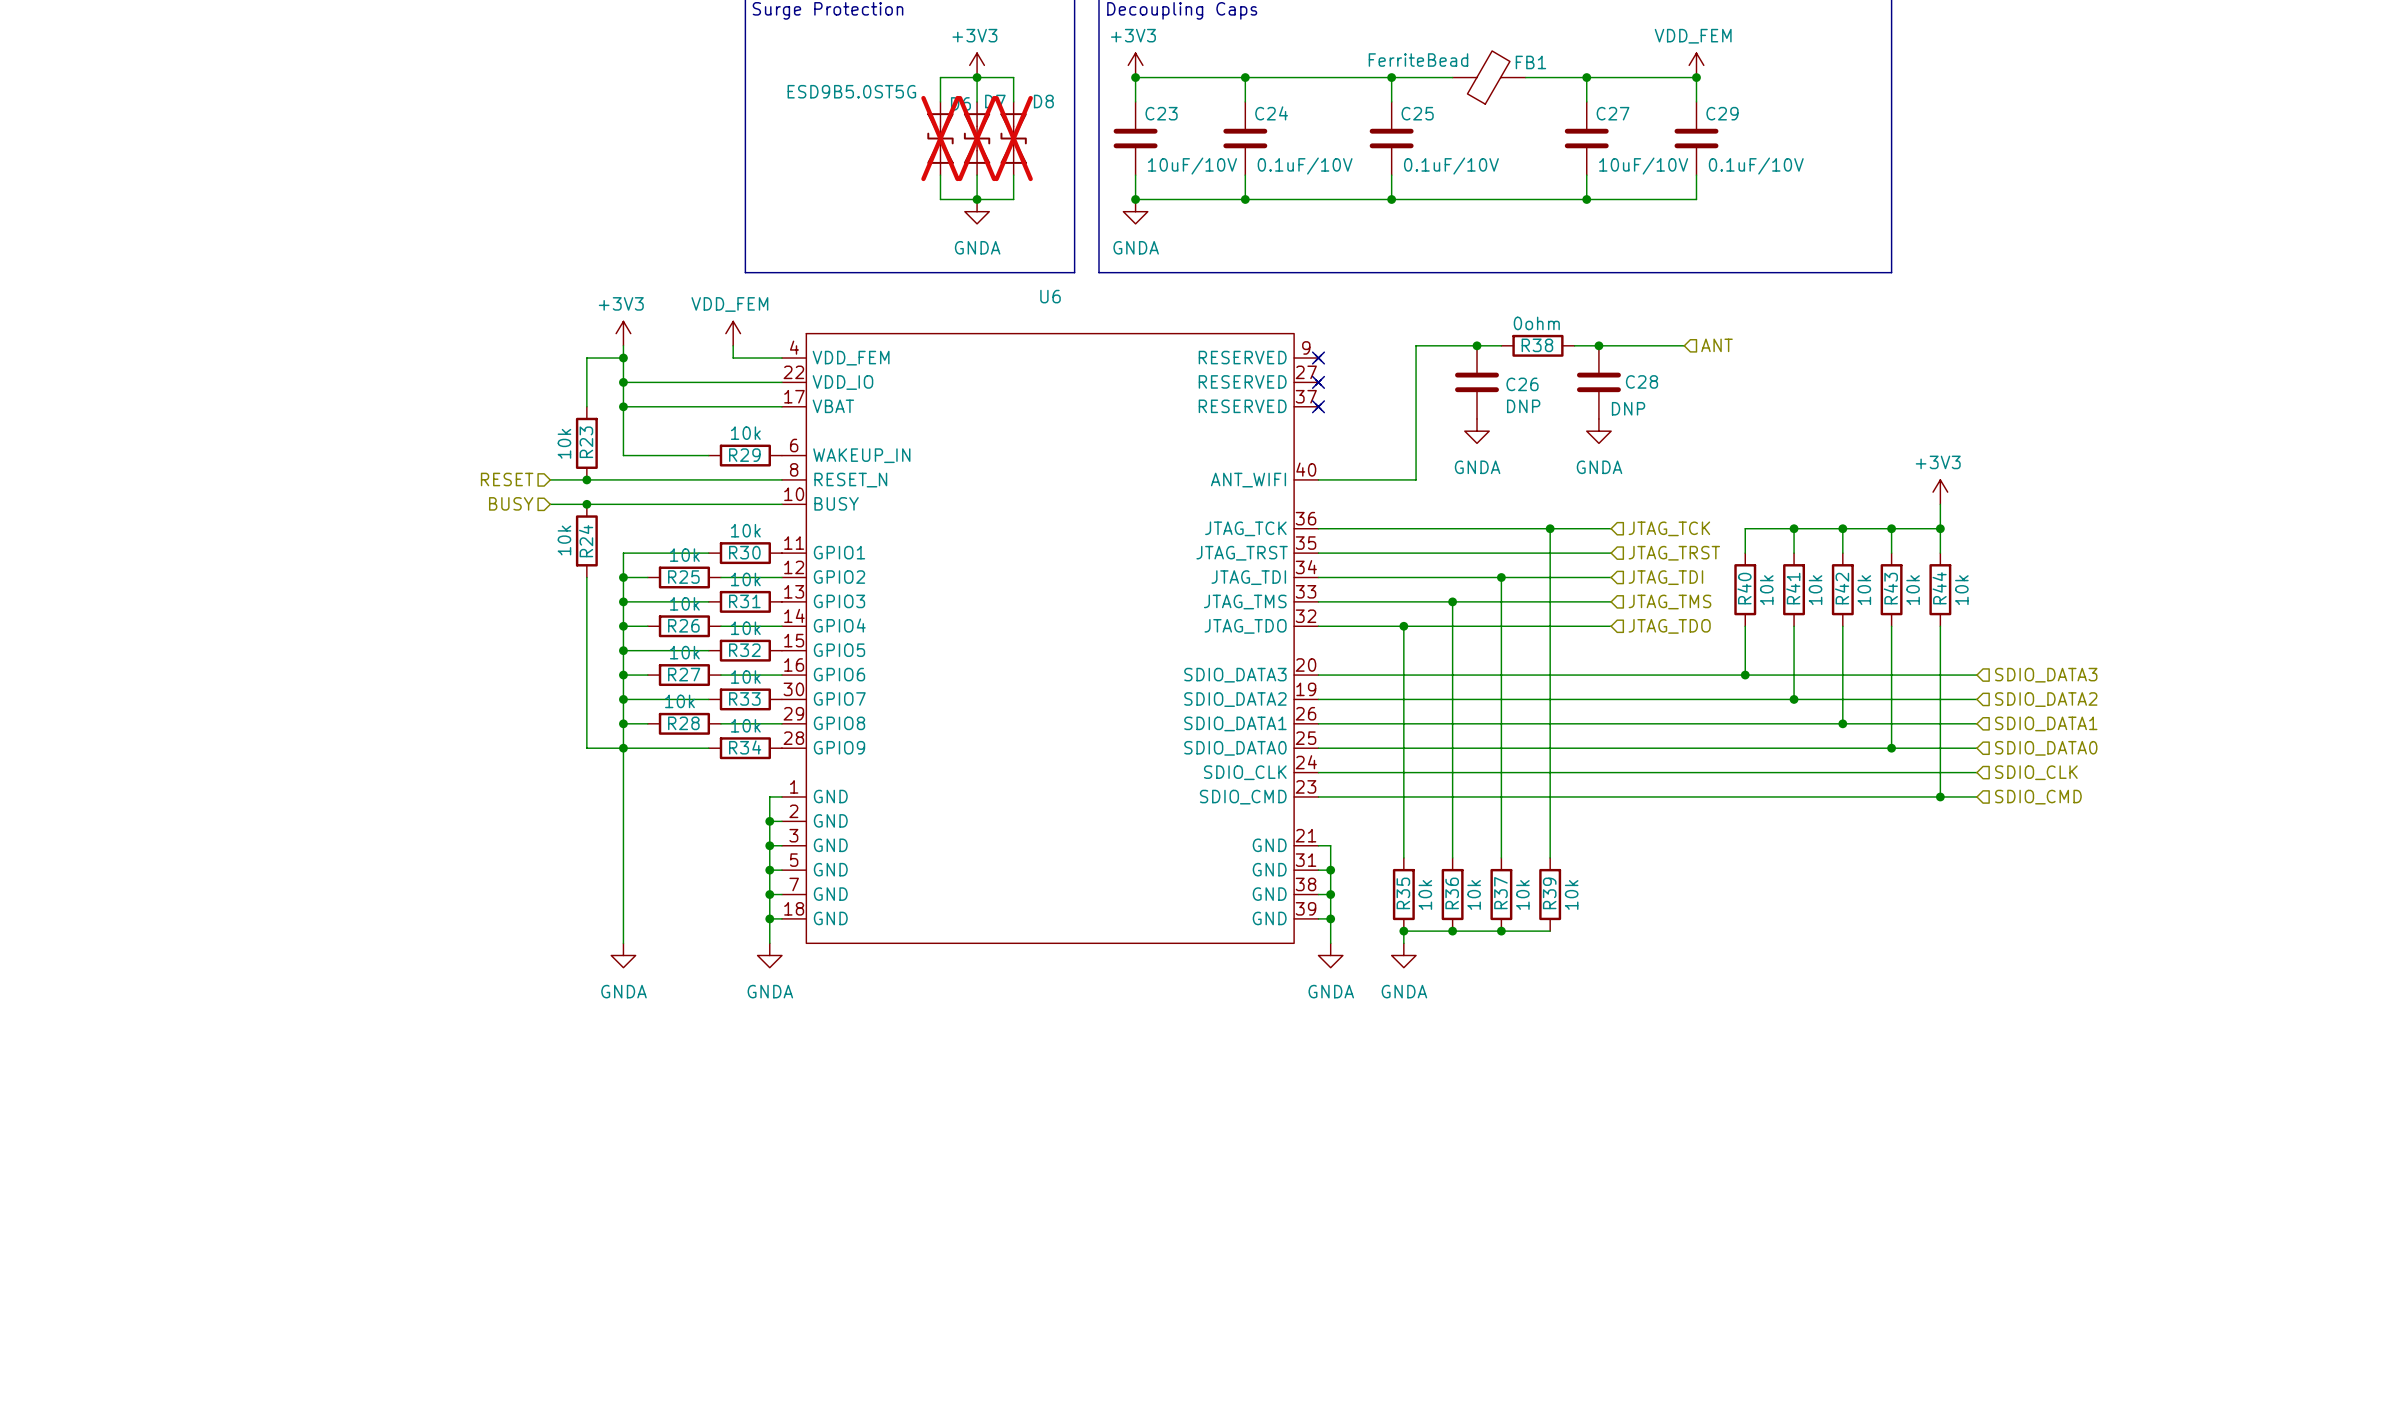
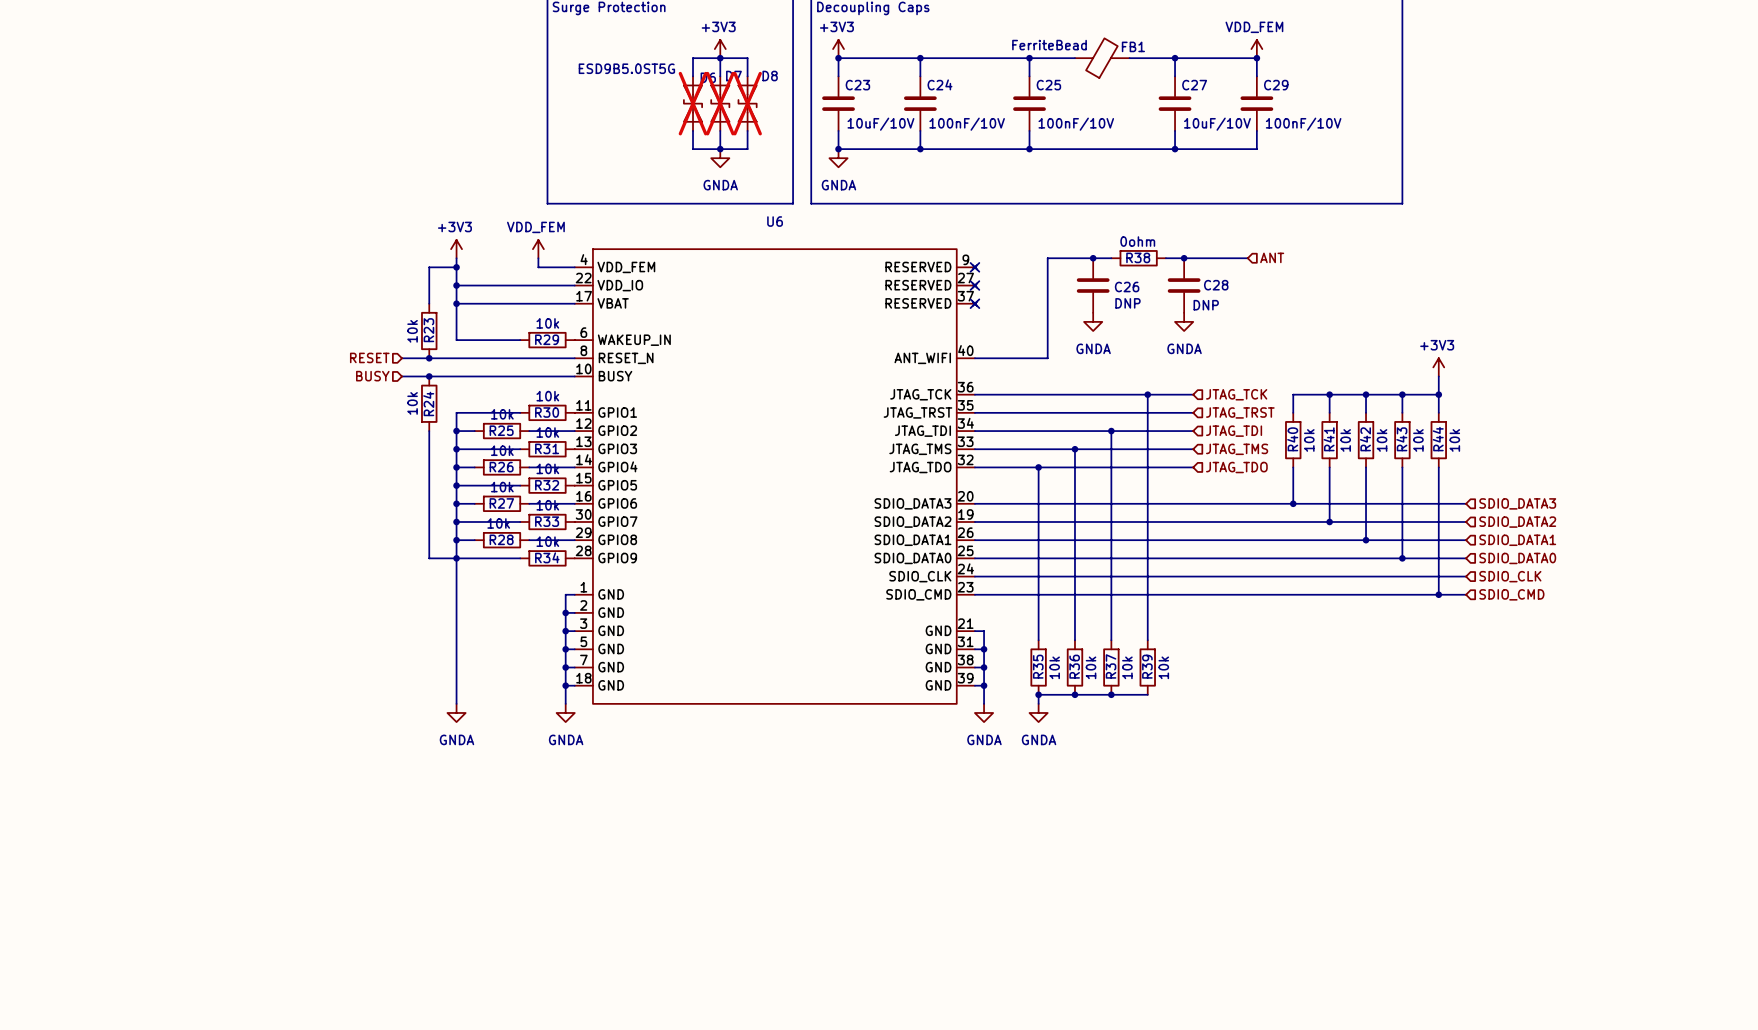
C24 value: 0.1uF/10V (1305, 166) -> 100nF/10V (967, 124)
C25 value: 0.1uF/10V (1451, 166) -> 100nF/10V (1076, 124)
C29 value: 0.1uF/10V (1756, 166) -> 100nF/10V (1303, 124)

